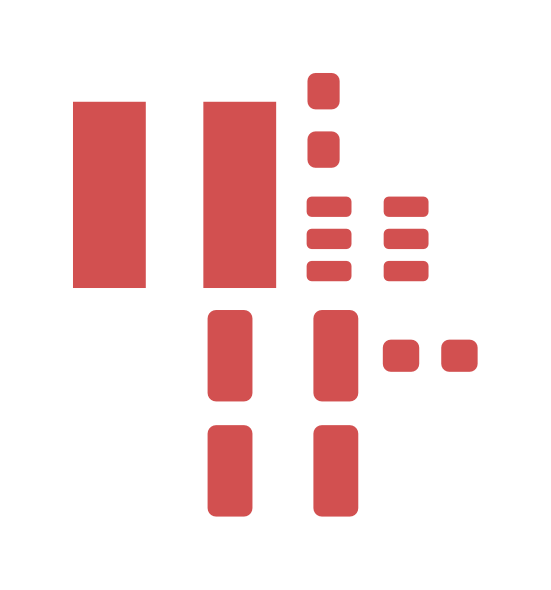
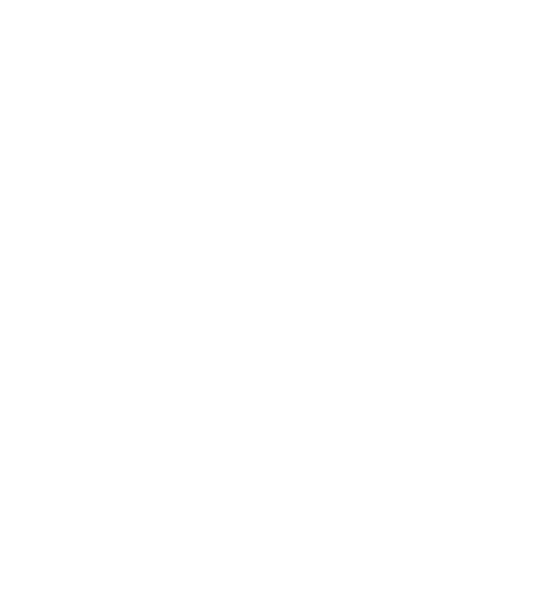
part: (323, 120) -> none
part: (174, 194) -> none
part: (367, 238) -> none
part: (282, 355) -> none
part: (430, 355) -> none
part: (282, 470) -> none

